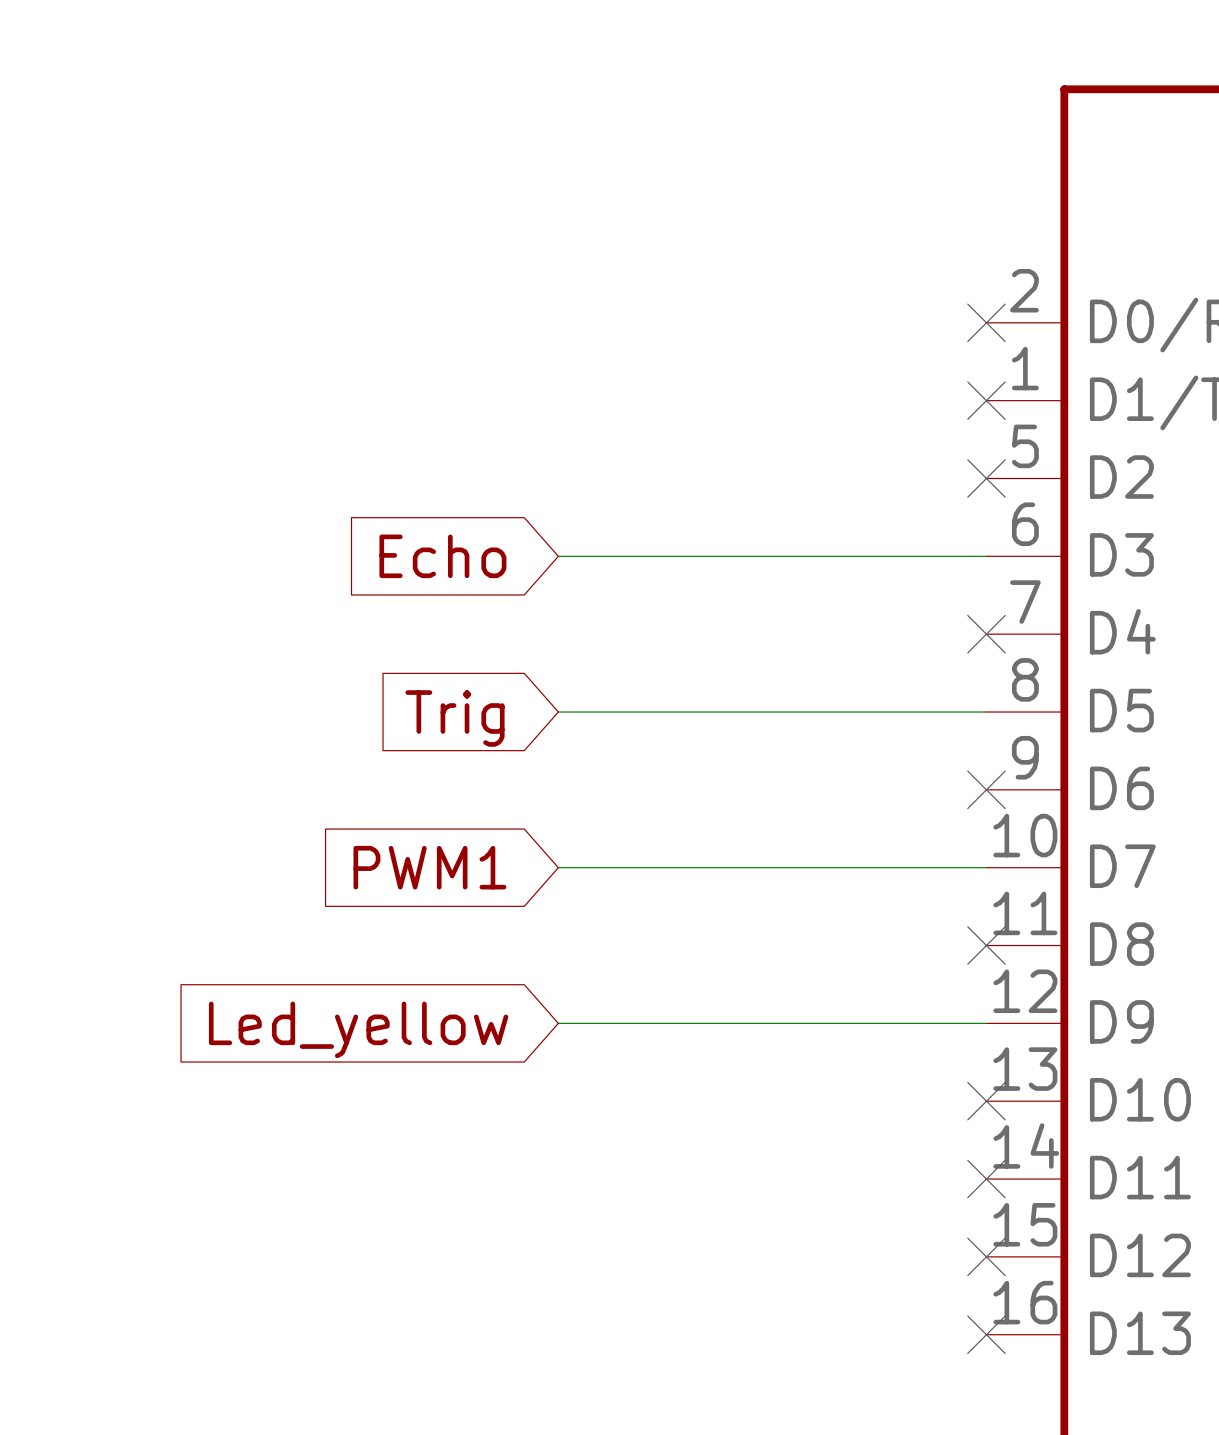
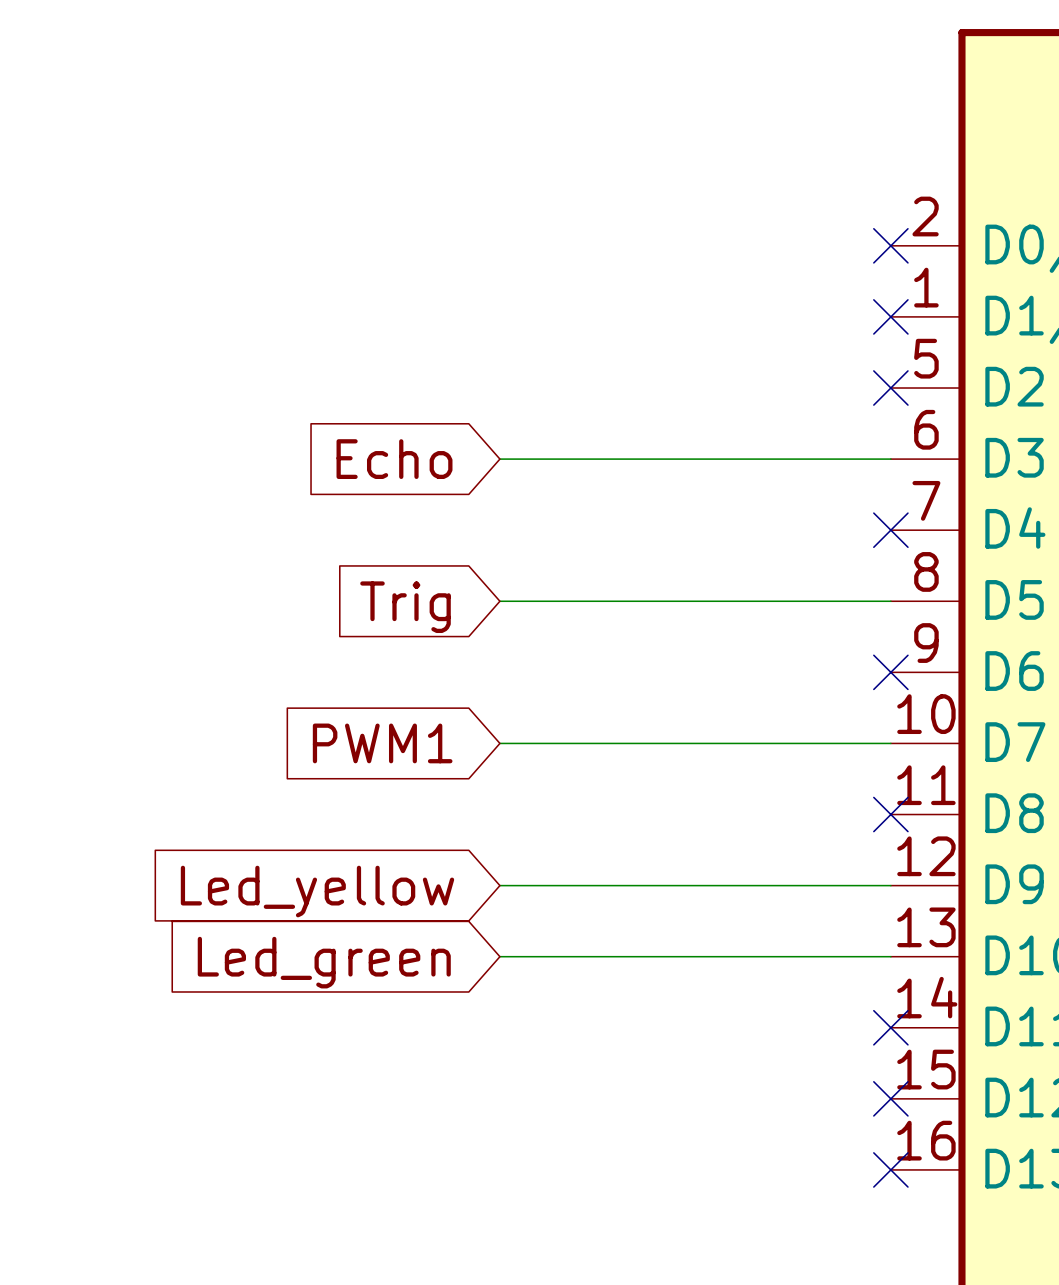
wire: none -> (499, 956) (890, 956)
no-connect mark: (986, 1101) -> none
global label: none -> Led_green (324, 962)

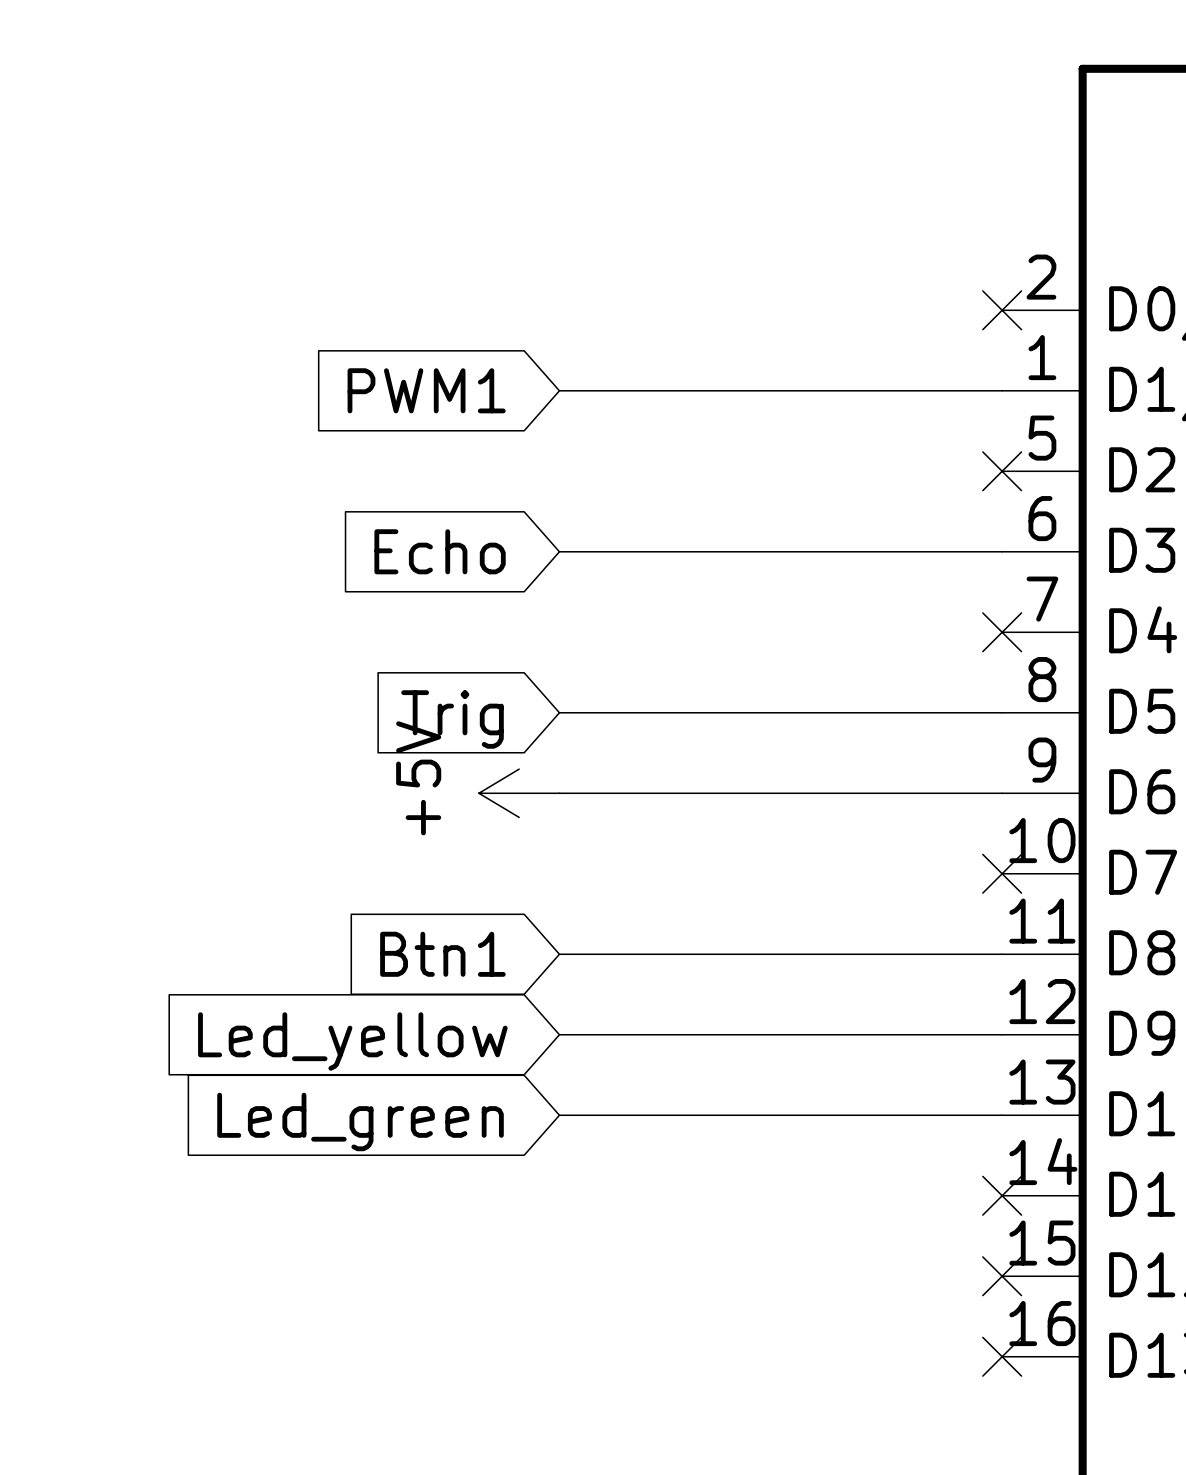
wire: none -> (559, 390) (1002, 390)
no-connect mark: (890, 316) -> none
power symbol: none -> +5V (519, 793)
wire: none -> (559, 793) (1002, 793)
no-connect mark: (890, 672) -> none
global label position: PWM1 (382, 743) -> PWM1 (426, 390)
wire: (499, 743) (890, 743) -> (559, 954) (1002, 954)
no-connect mark: none -> (1002, 873)
global label: none -> Btn1 (442, 954)
no-connect mark: (890, 814) -> none

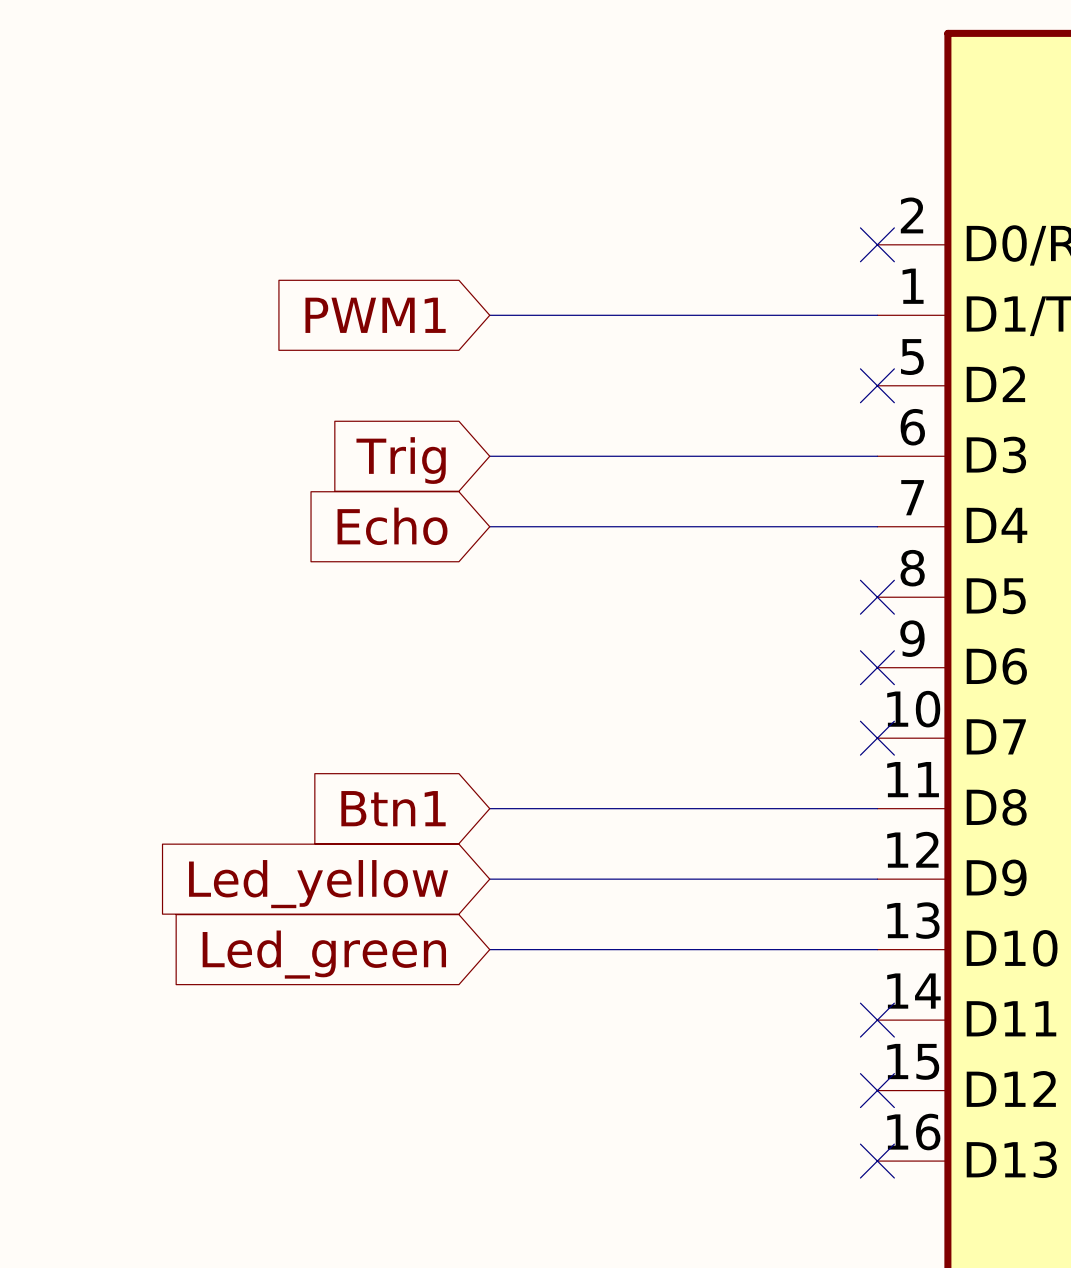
global label: Echo (440, 551) -> Trig (401, 460)
global label: none -> Echo (392, 526)
no-connect mark: (1002, 632) -> none
wire: (559, 712) (1002, 712) -> (489, 526) (877, 526)
no-connect mark: none -> (877, 597)
global label: Trig (452, 719) -> none
power symbol: +5V (519, 793) -> none
wire: (559, 793) (1002, 793) -> none
no-connect mark: none -> (877, 667)

